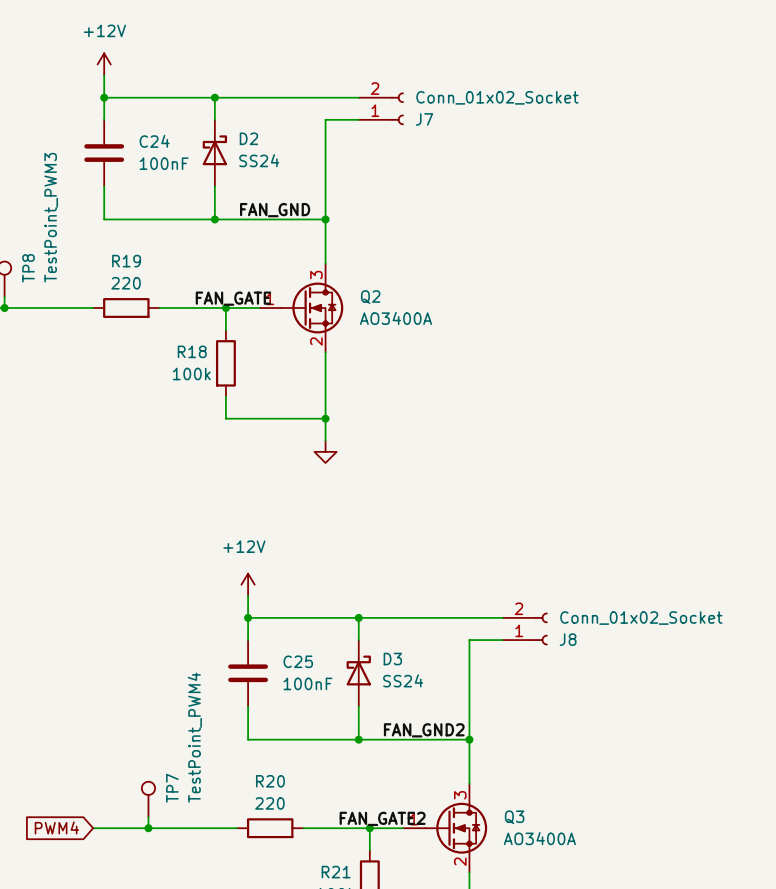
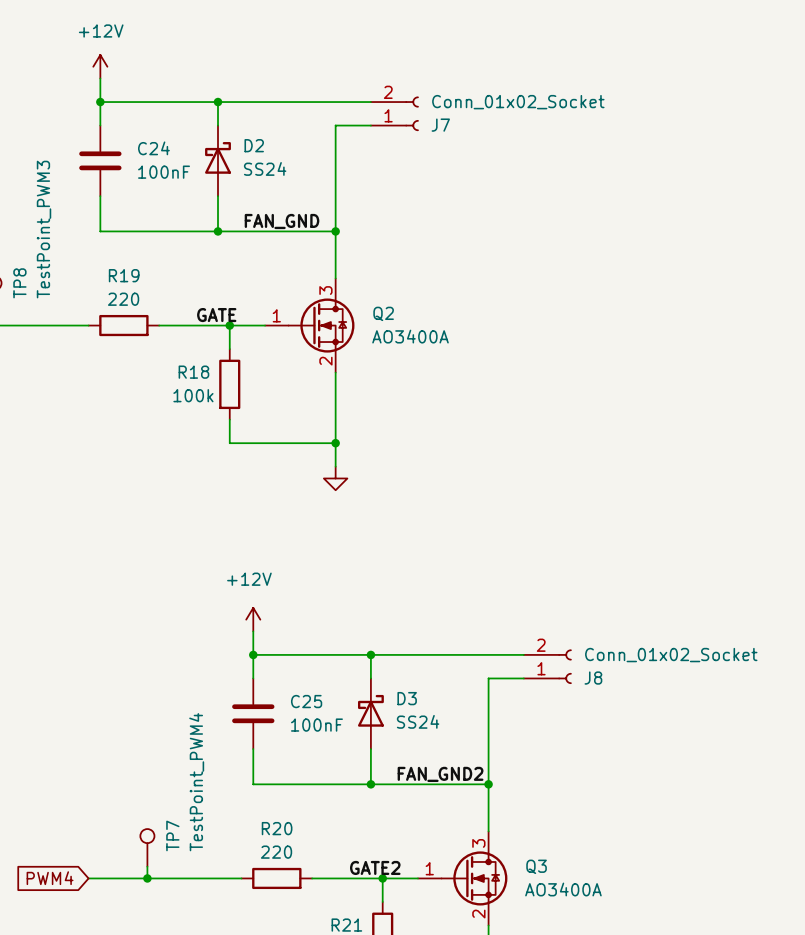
label: FAN_GATE (233, 298) -> GATE (216, 315)
label: FAN_GATE2 (382, 818) -> GATE2 (375, 867)

